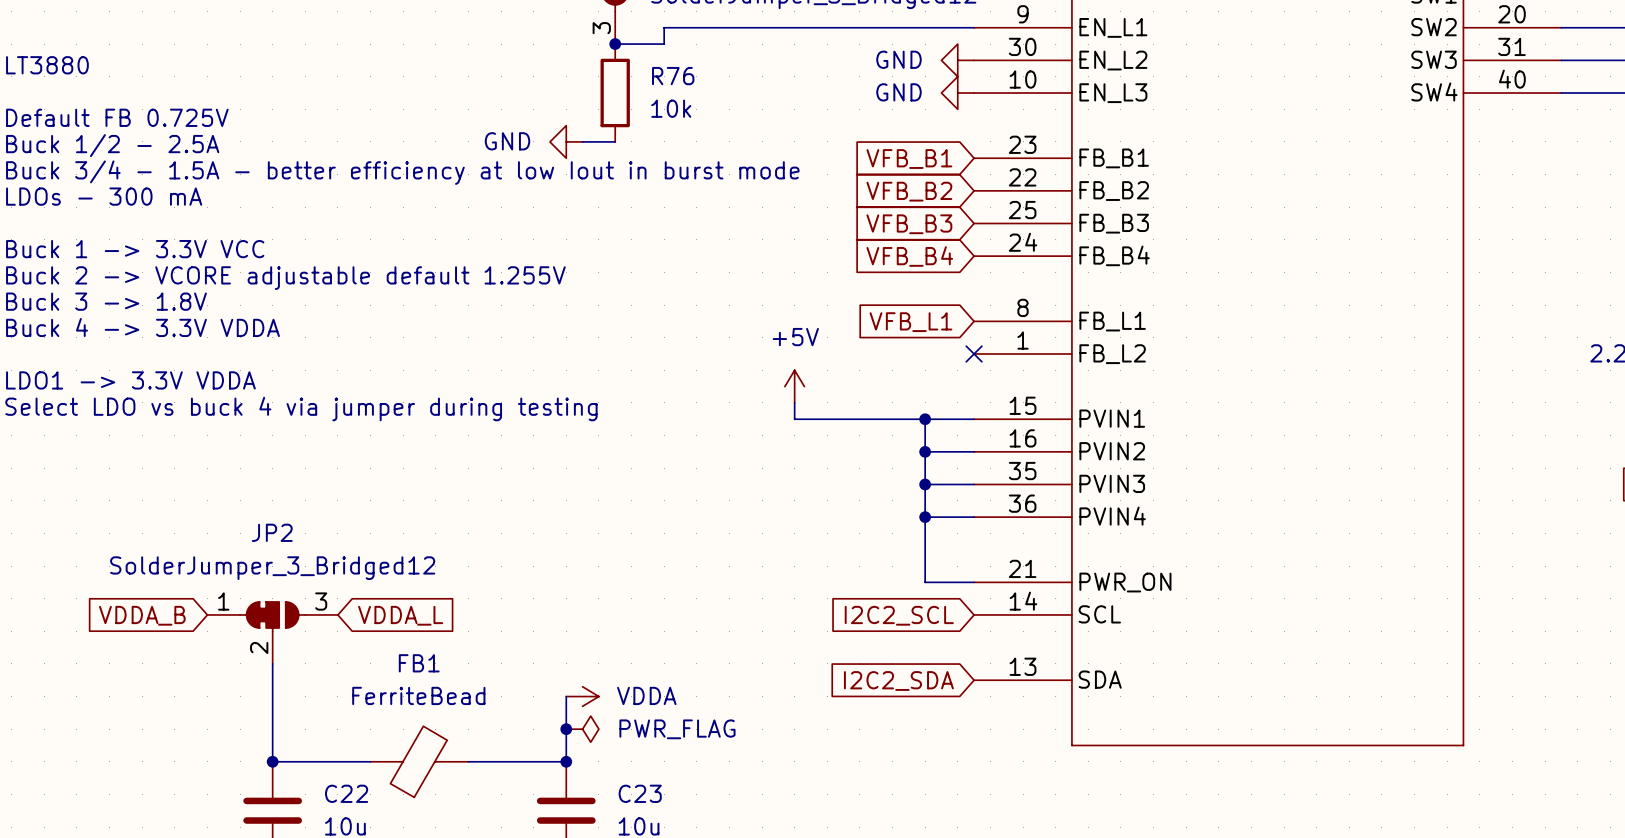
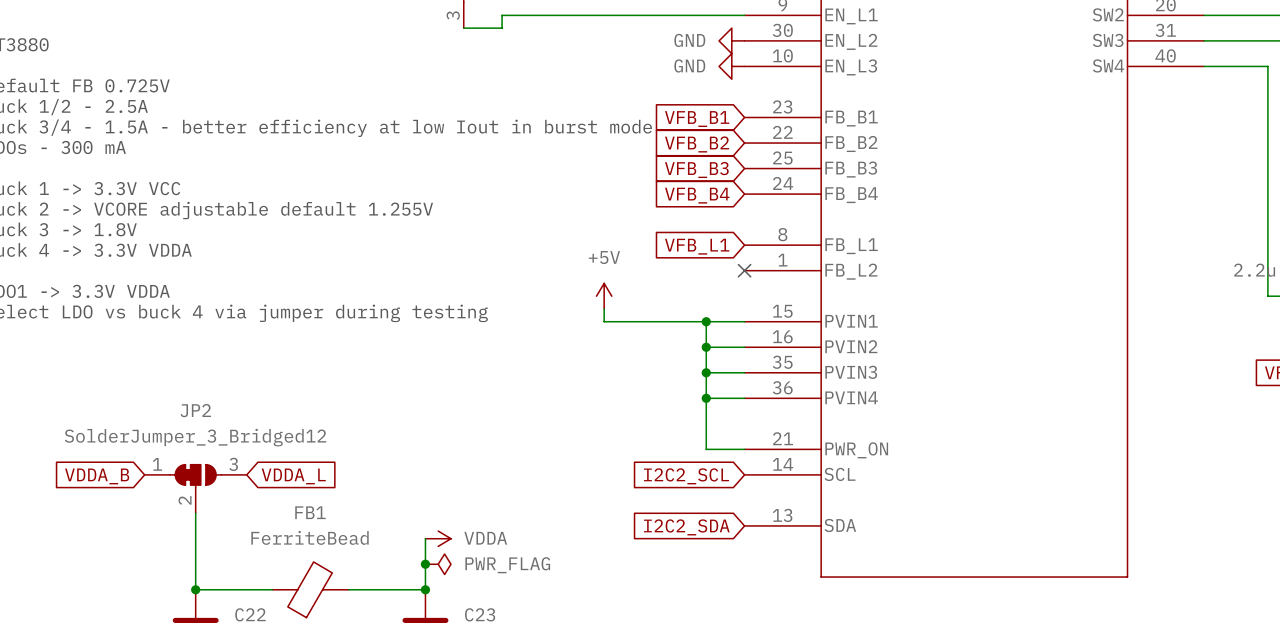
junction: (615, 44) -> none
R76: 10k (615, 92) -> none
power symbol: GND (566, 141) -> none
wire: (582, 141) (615, 141) -> none

